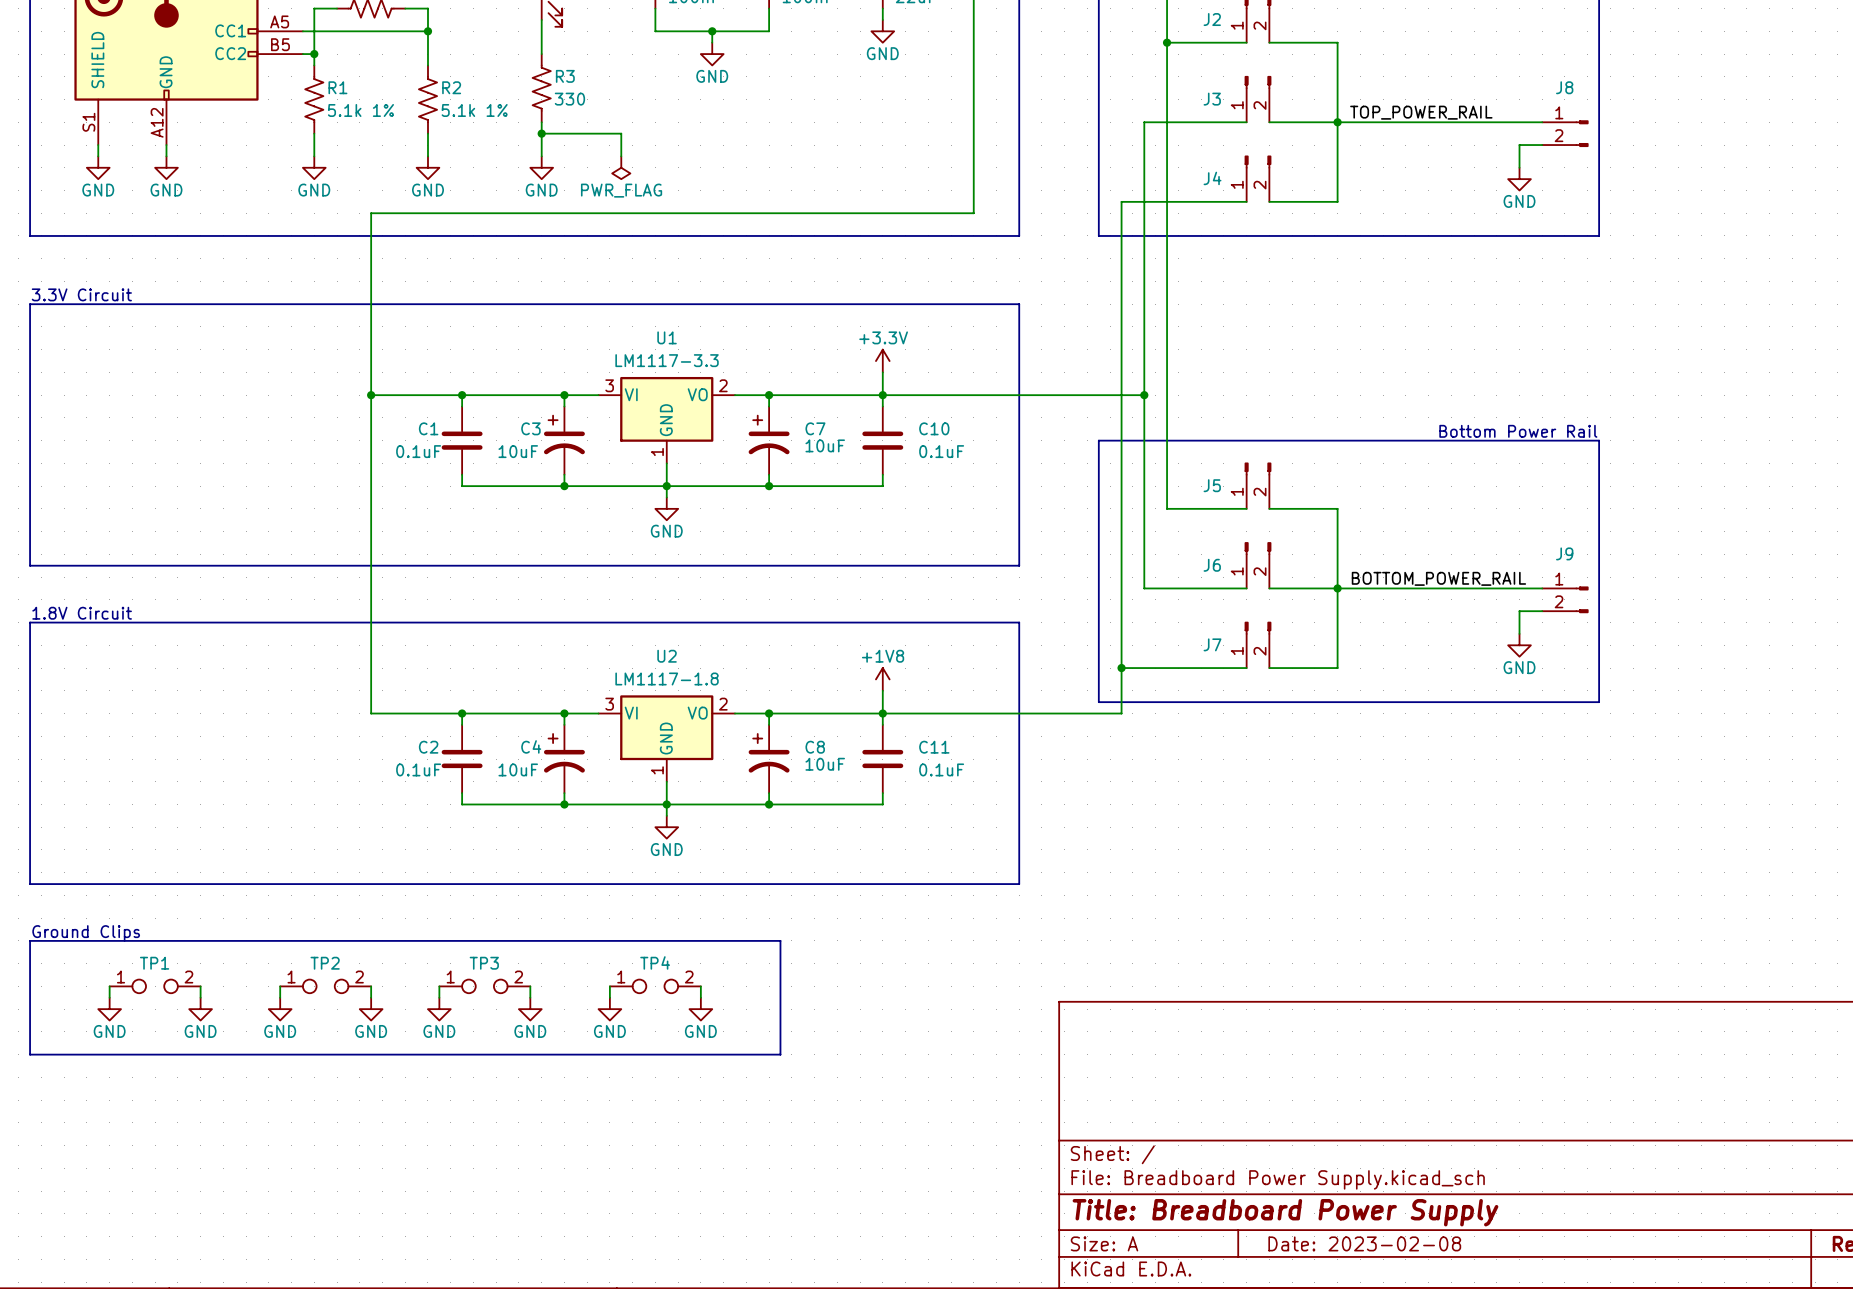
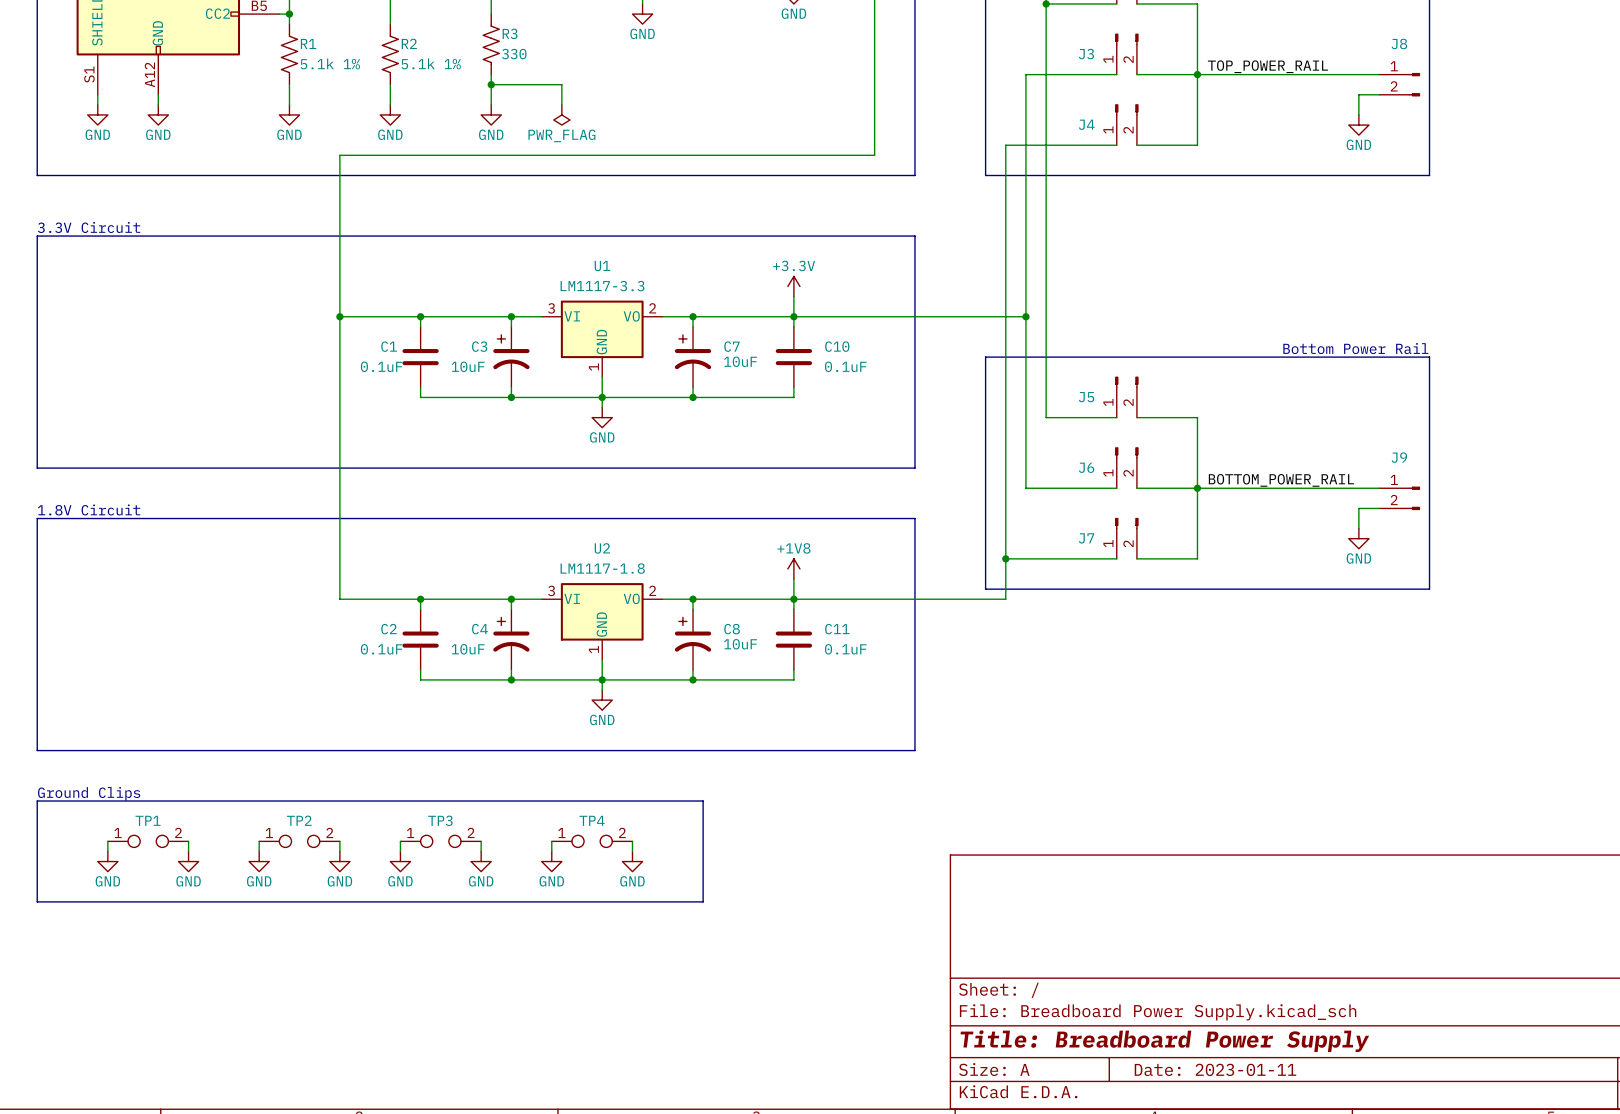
title block: Date: 2023-02-08 (1364, 1243) -> Date: 2023-01-11 (1215, 1069)

